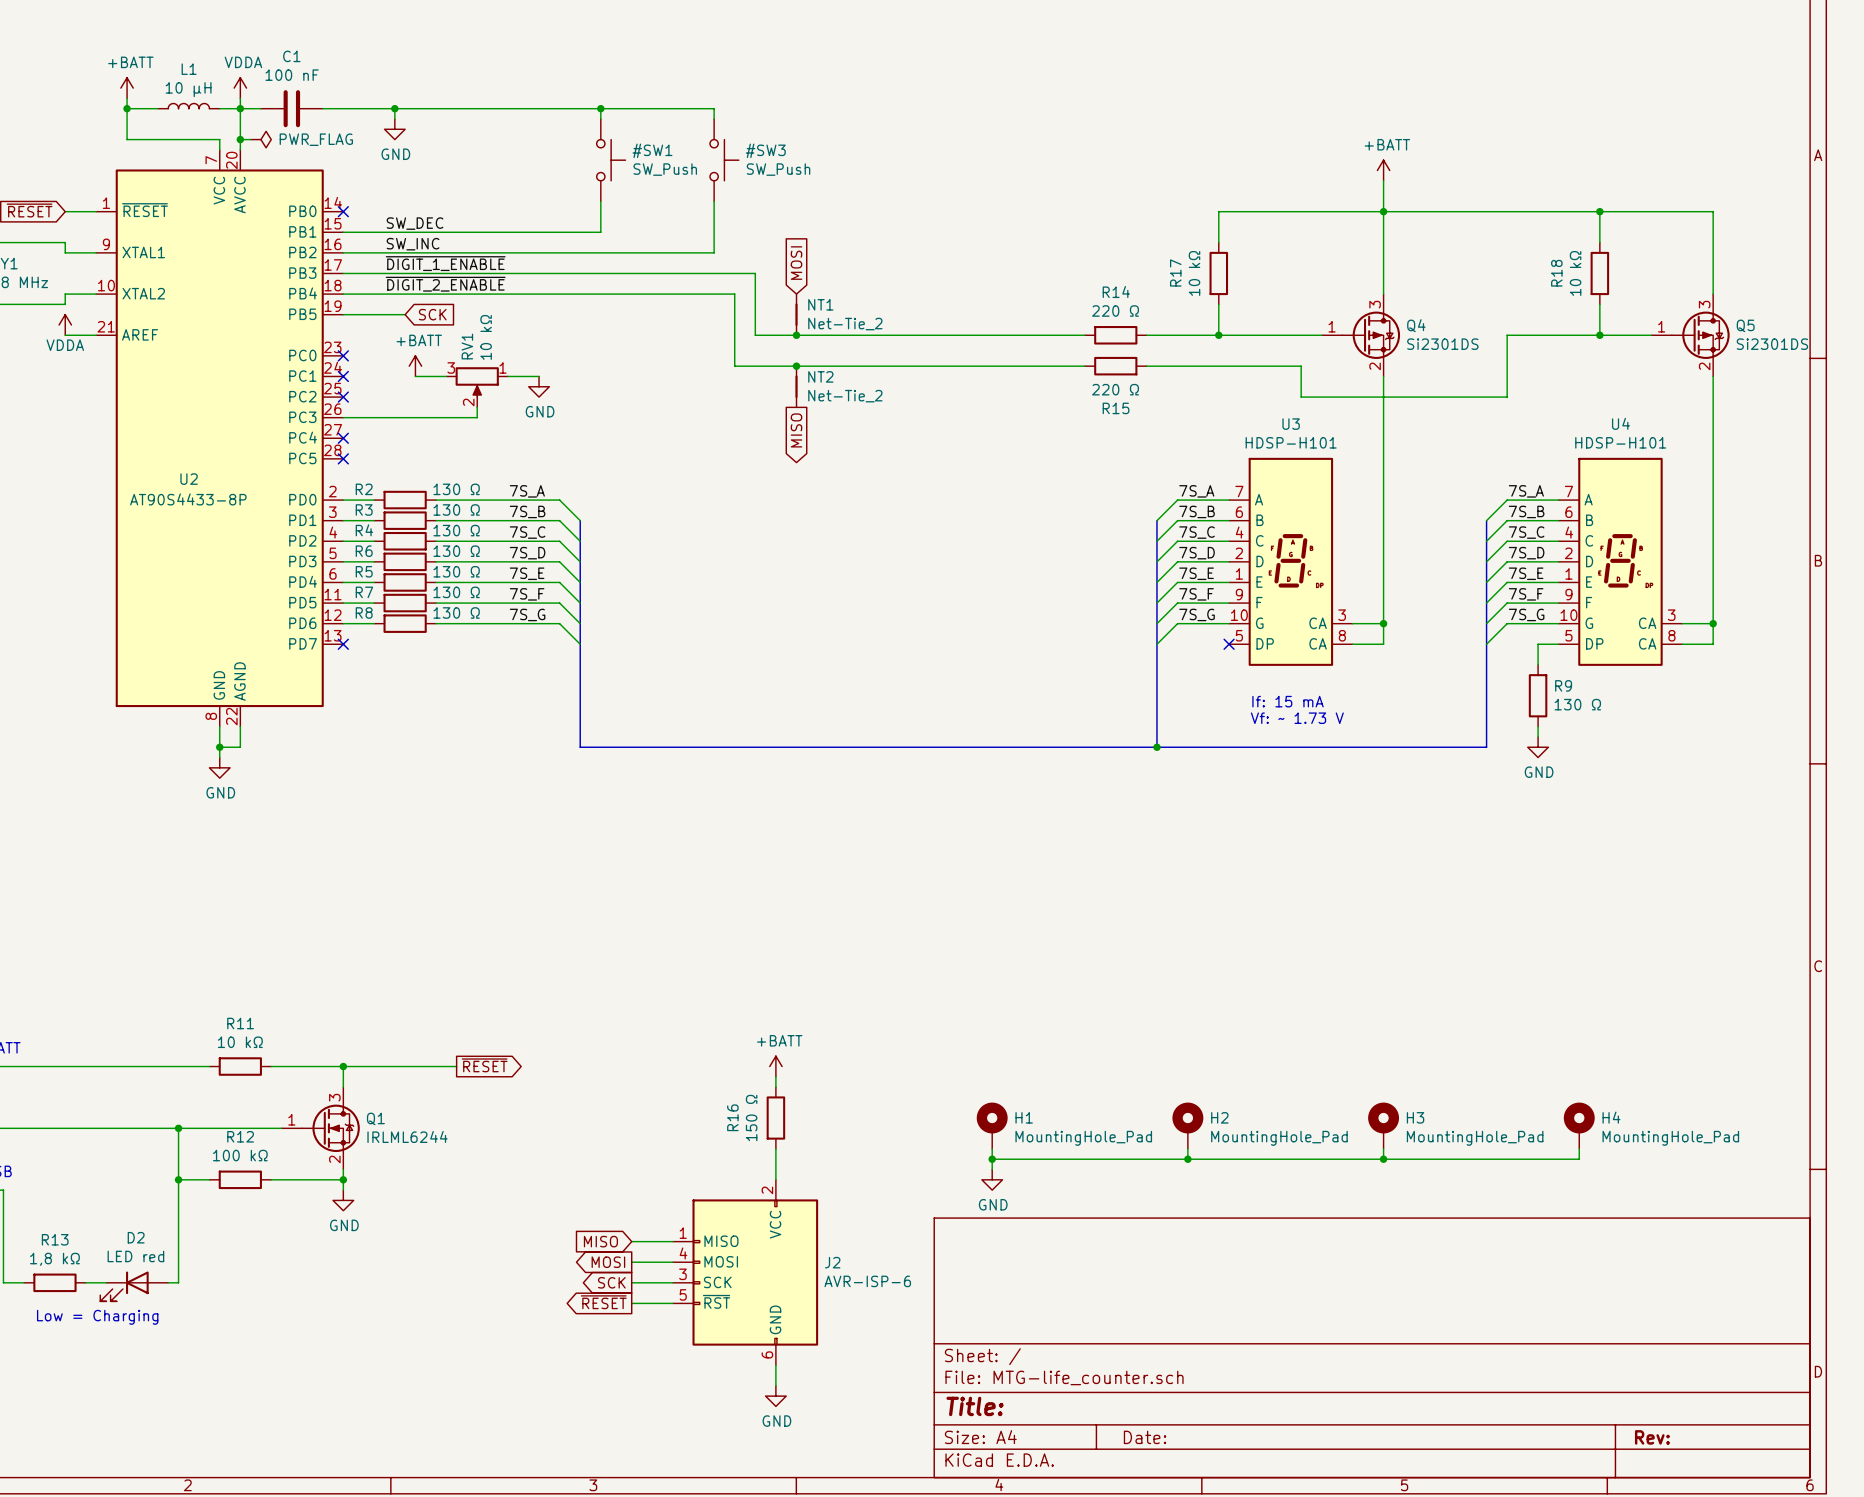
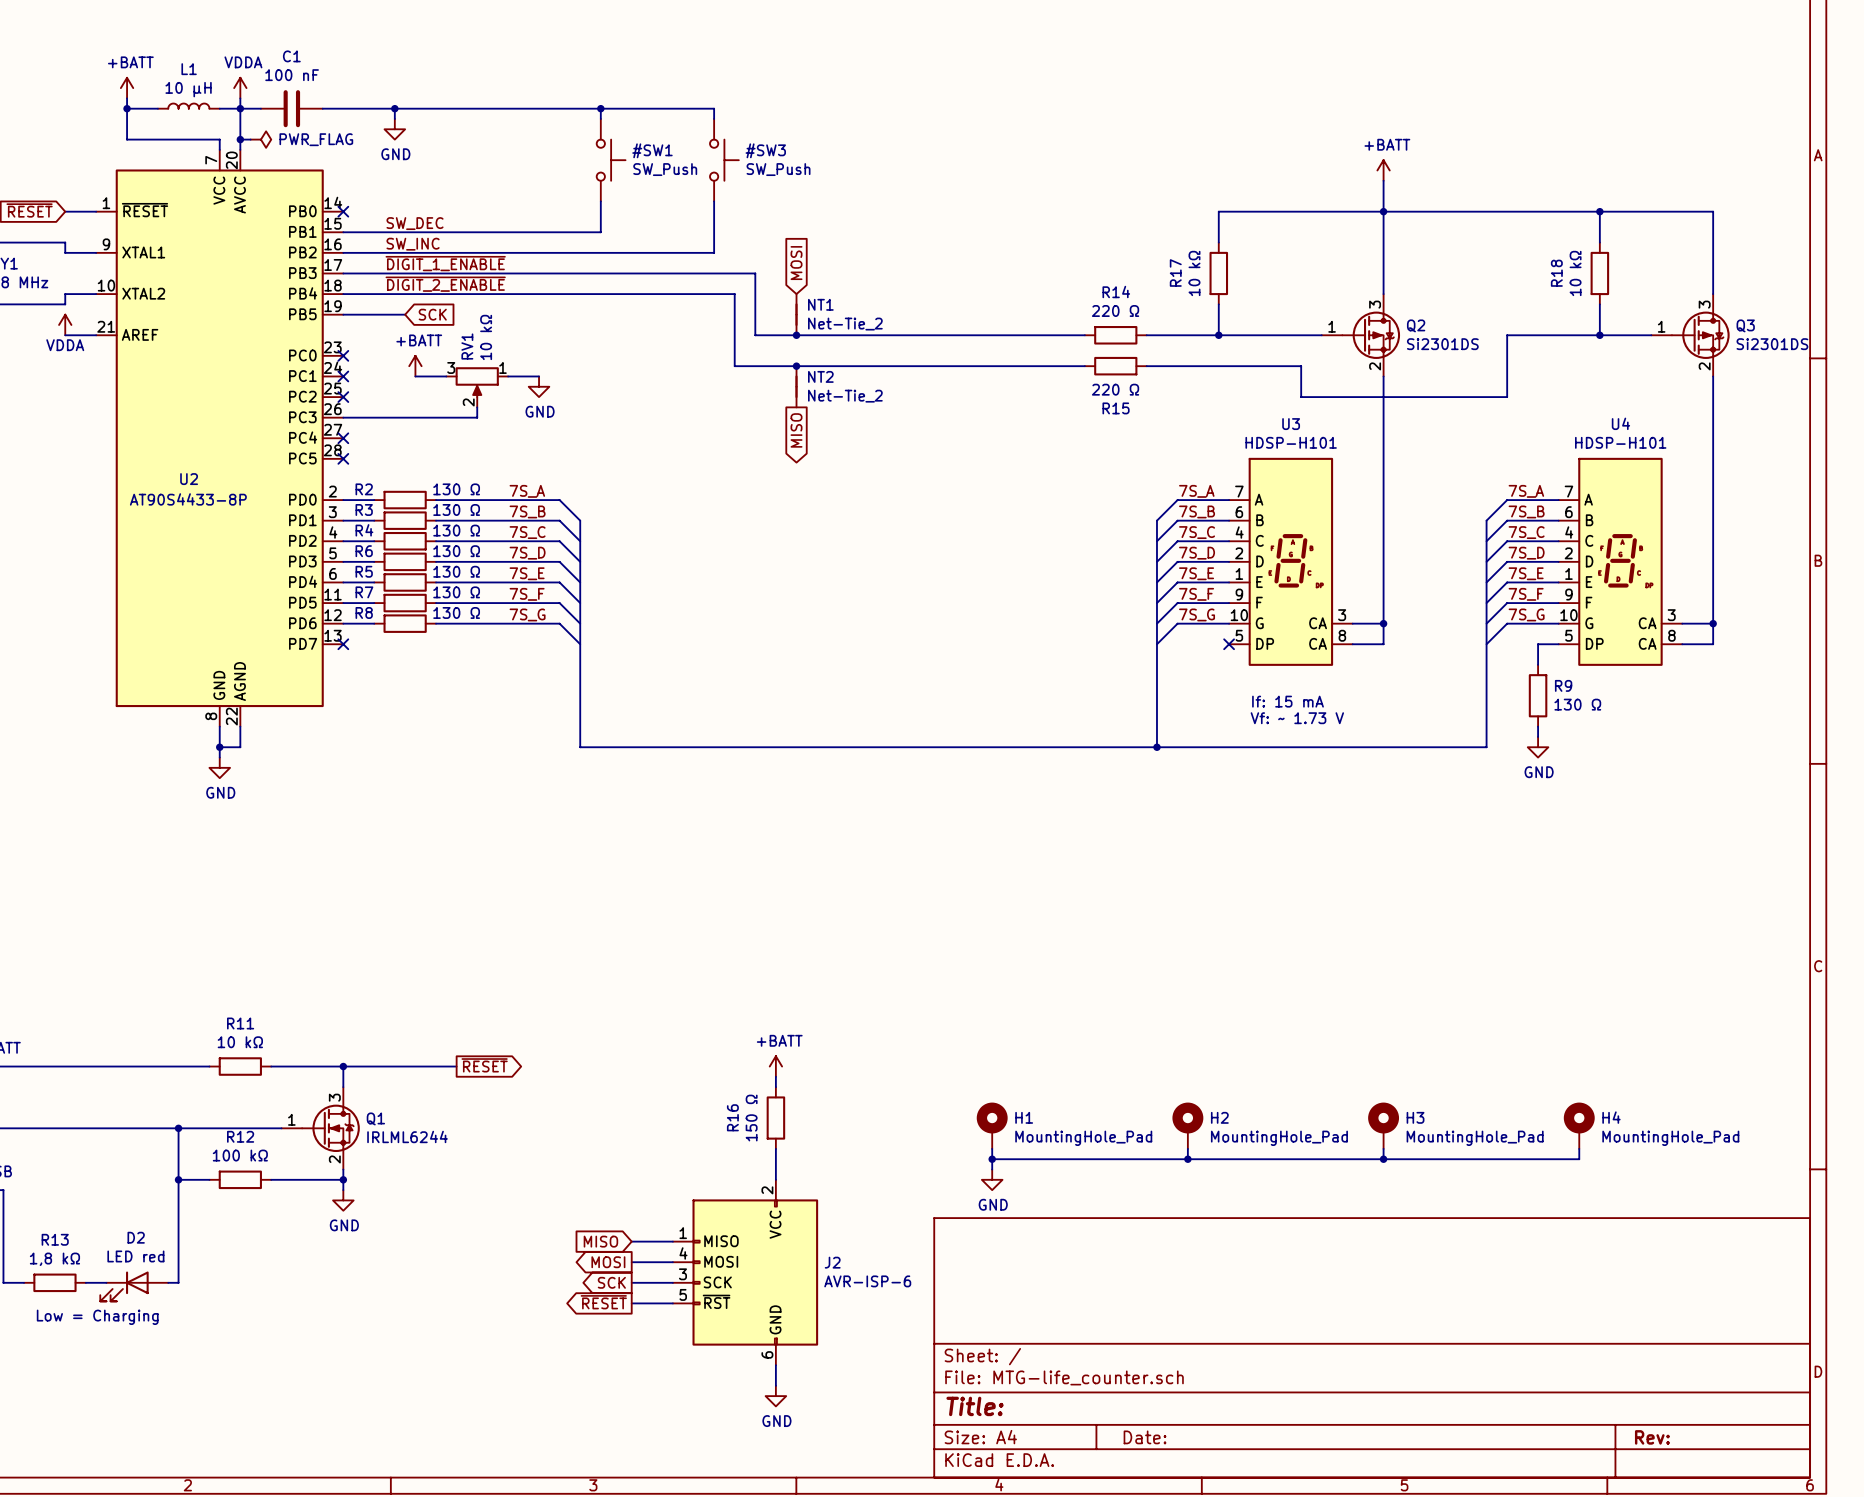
Q4 name: Q4 (1416, 325) -> Q2 (1416, 325)
Q5 name: Q5 (1745, 325) -> Q3 (1745, 325)

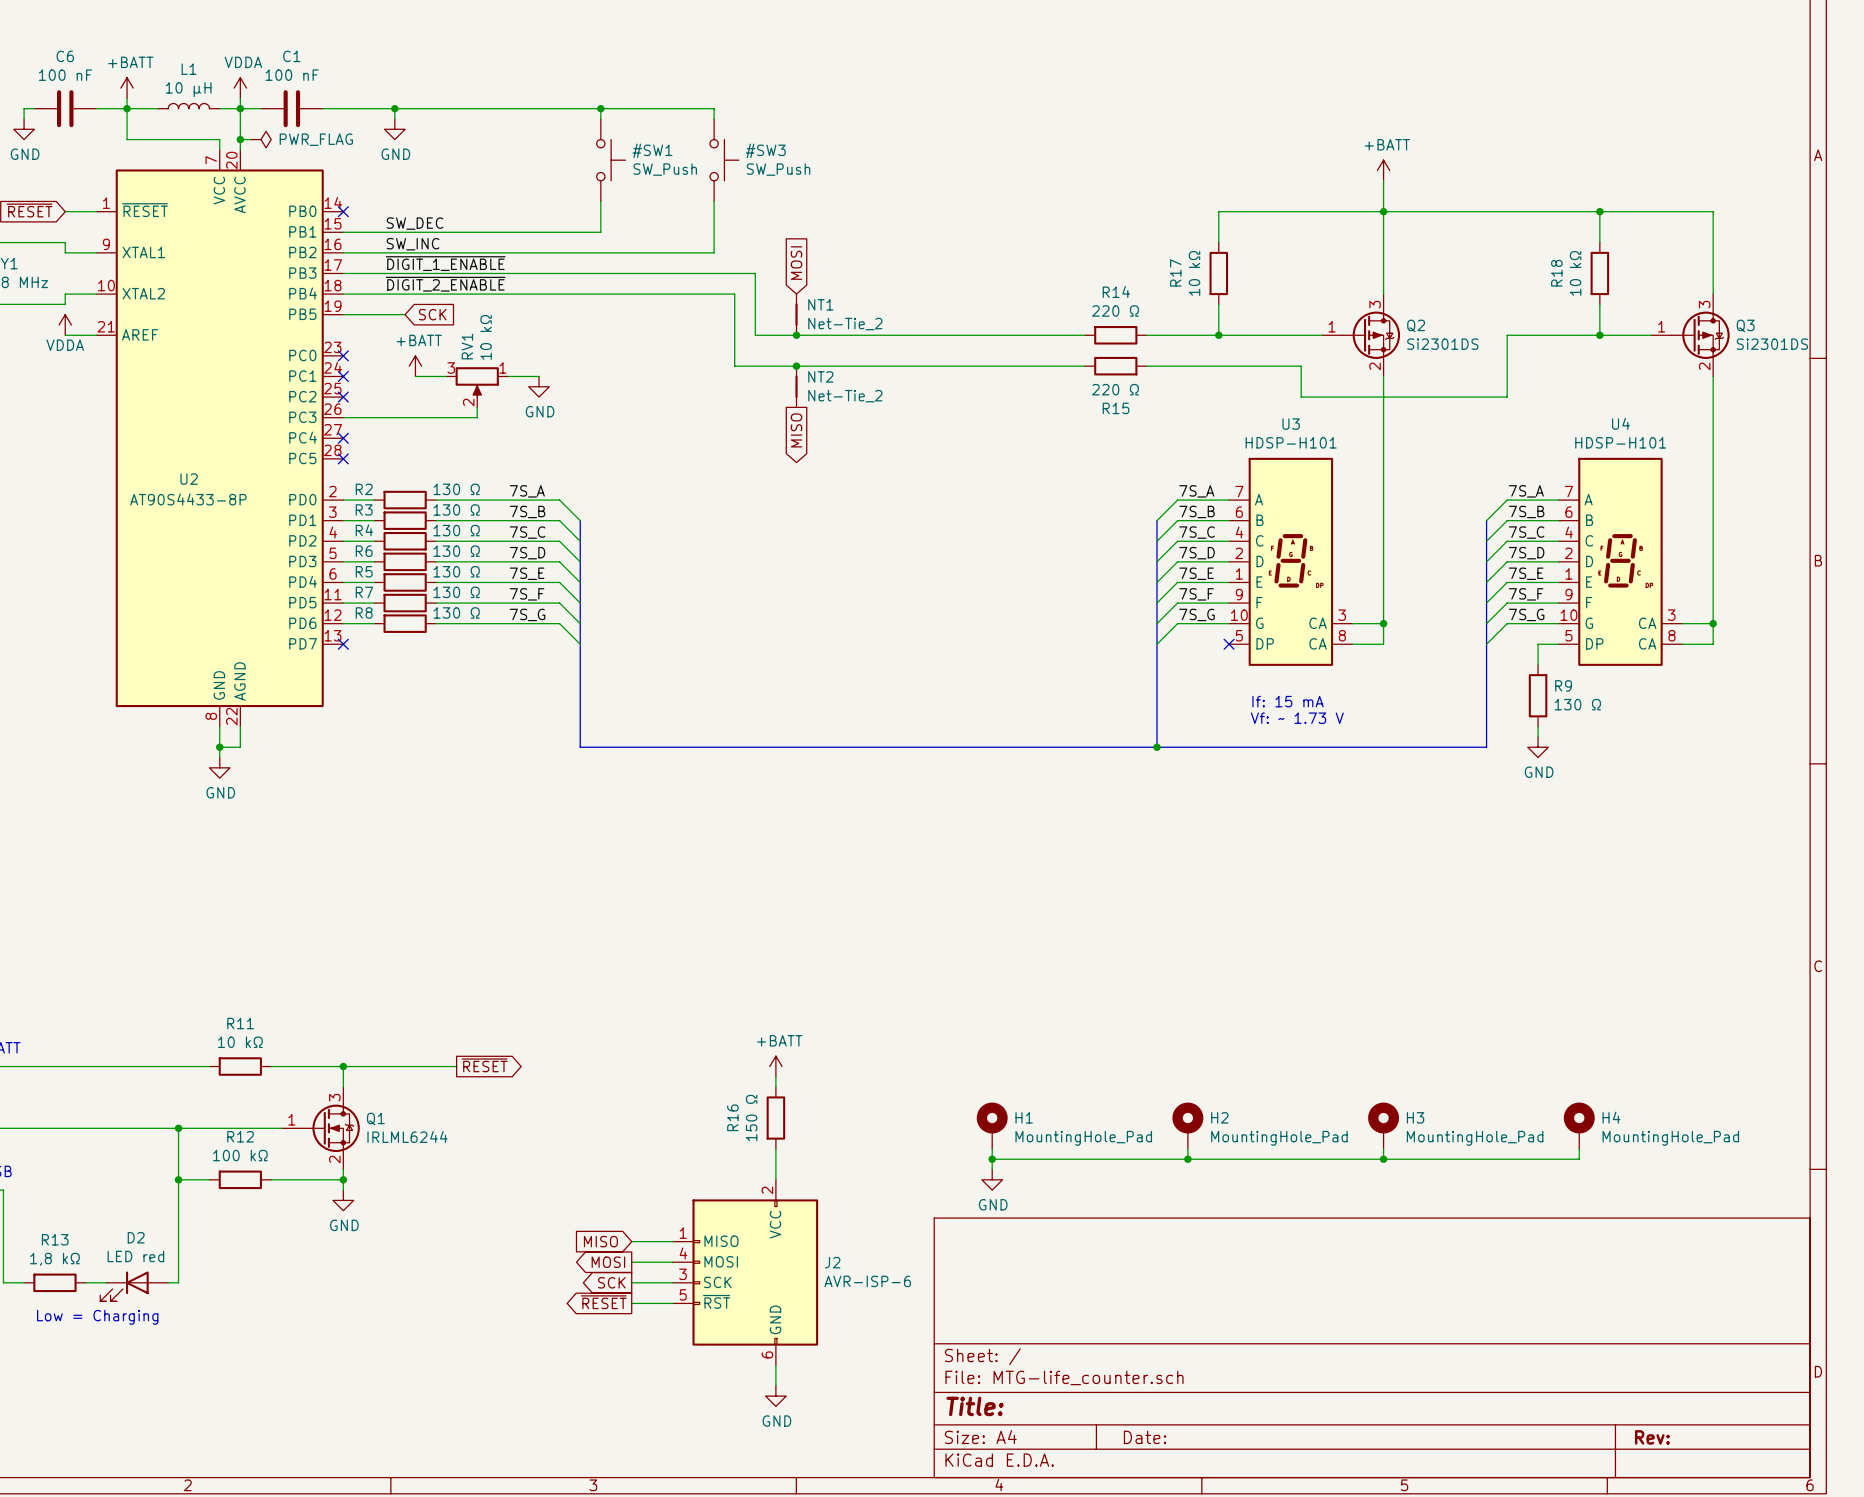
wire: none -> (34, 108) (24, 108) (24, 118)
C6: none -> 100 nF (65, 108)
wire: none -> (96, 108) (127, 108)
power symbol: none -> GND (24, 129)

